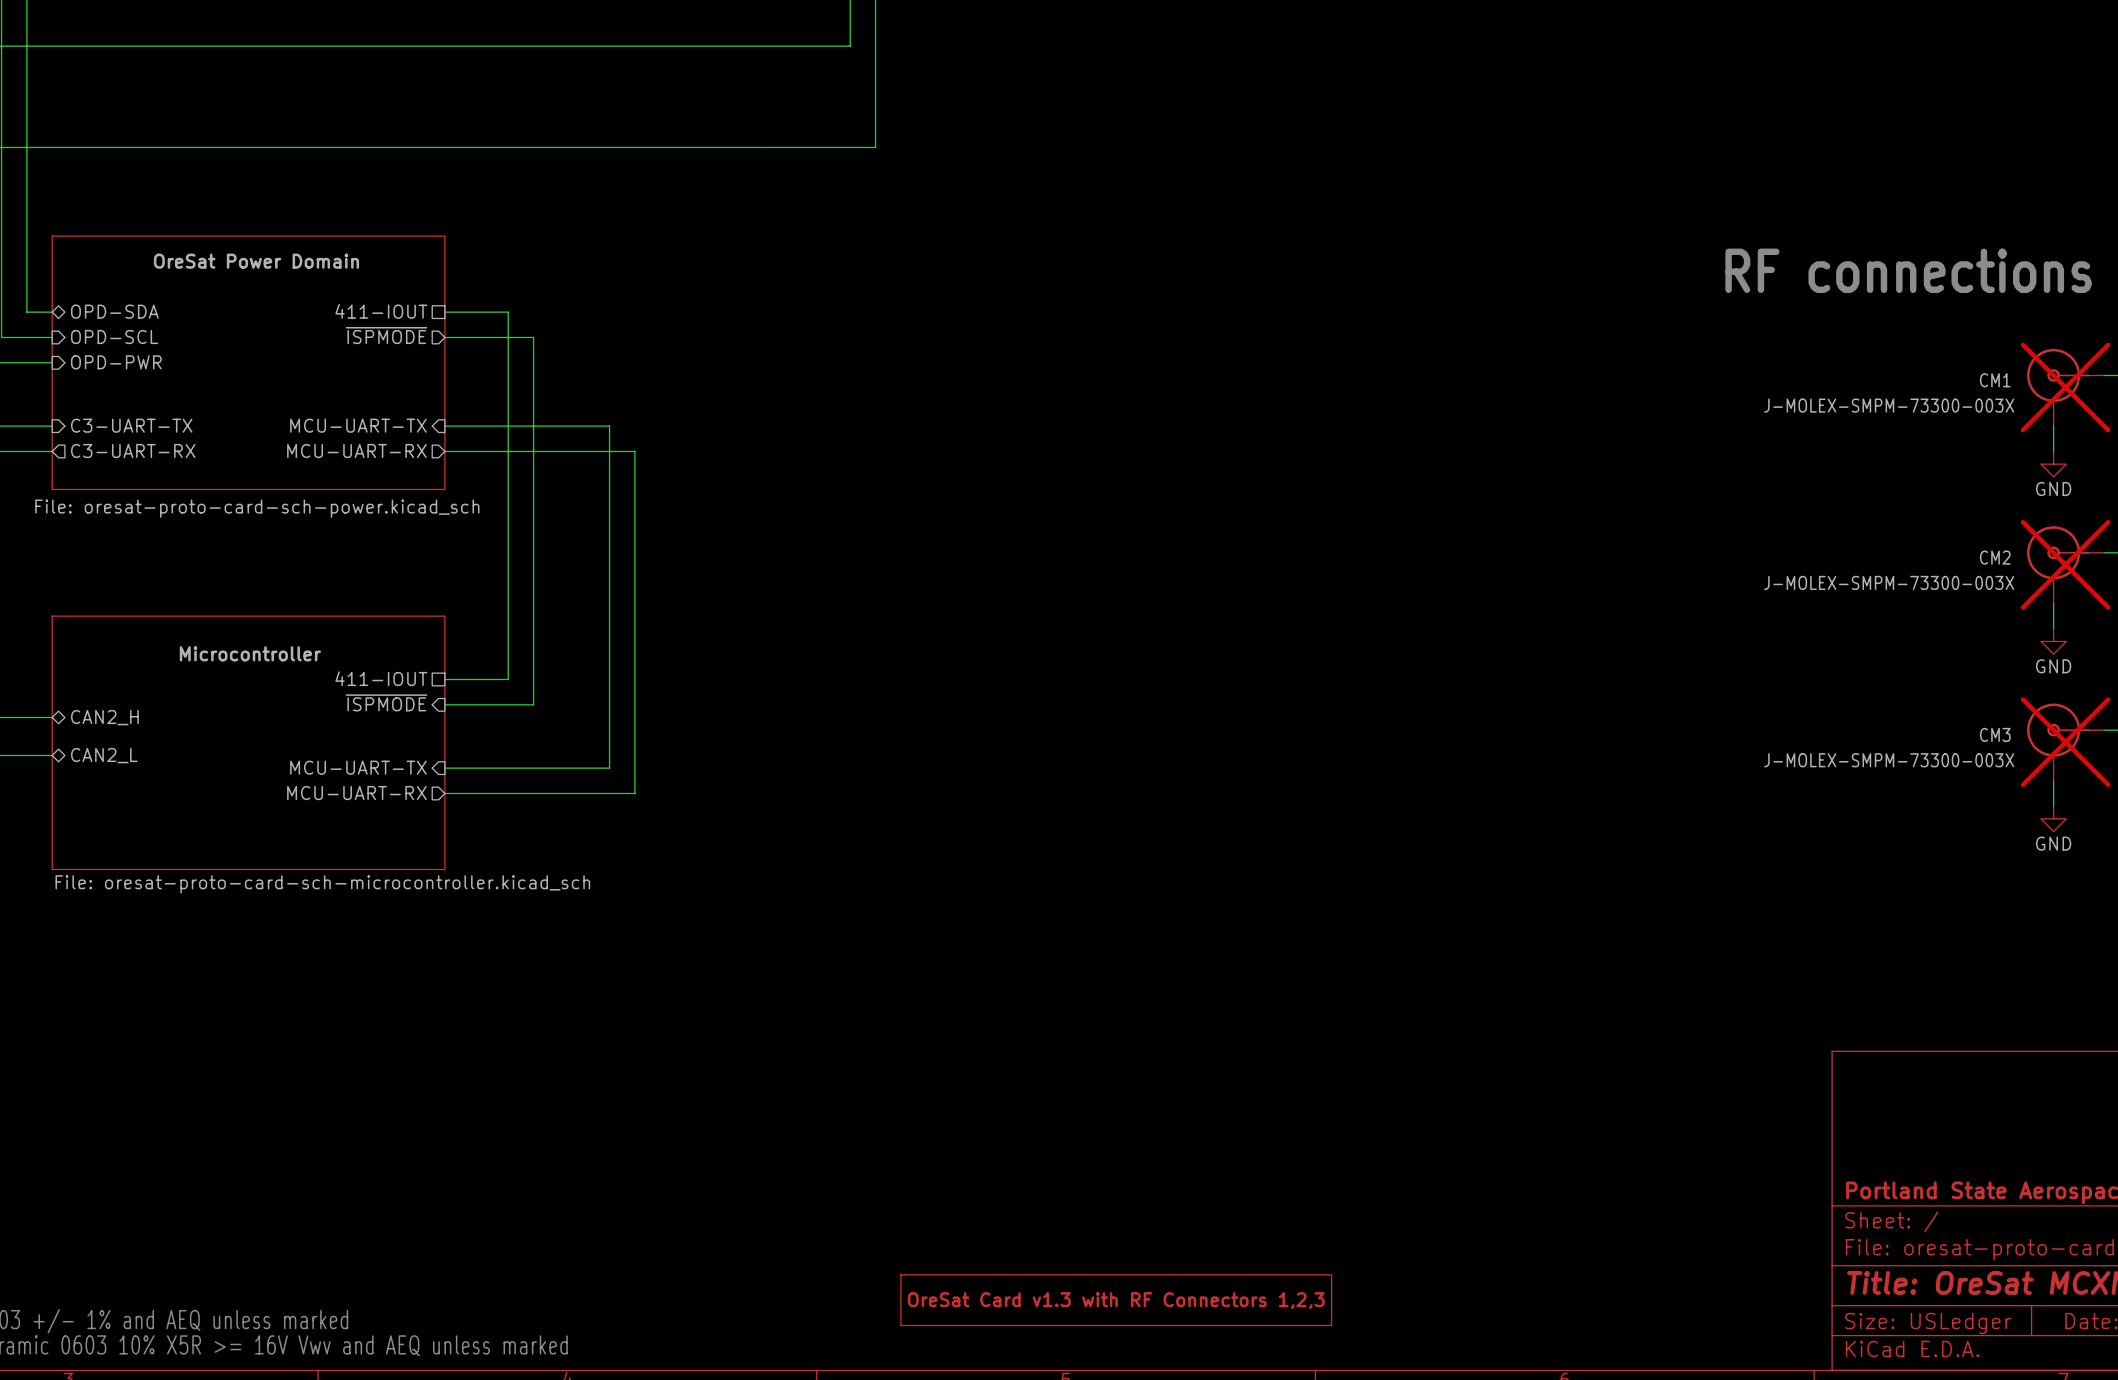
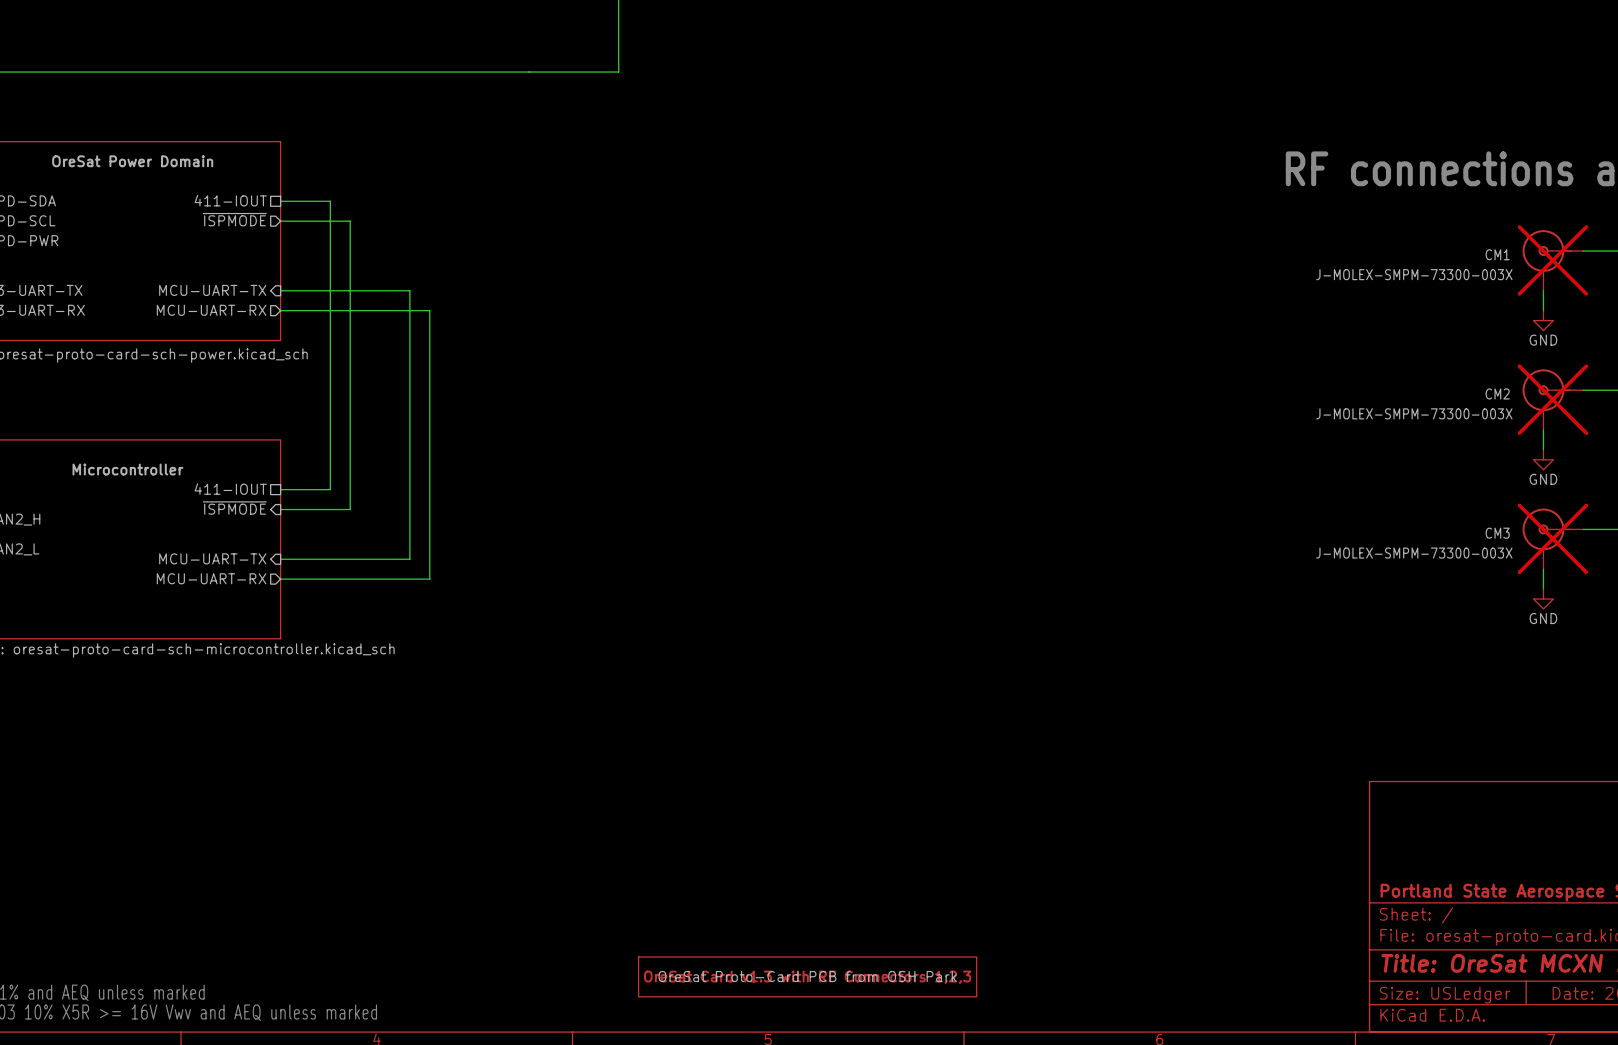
part text: none -> OreSat Proto-Card PCB from OSH Park (807, 976)

